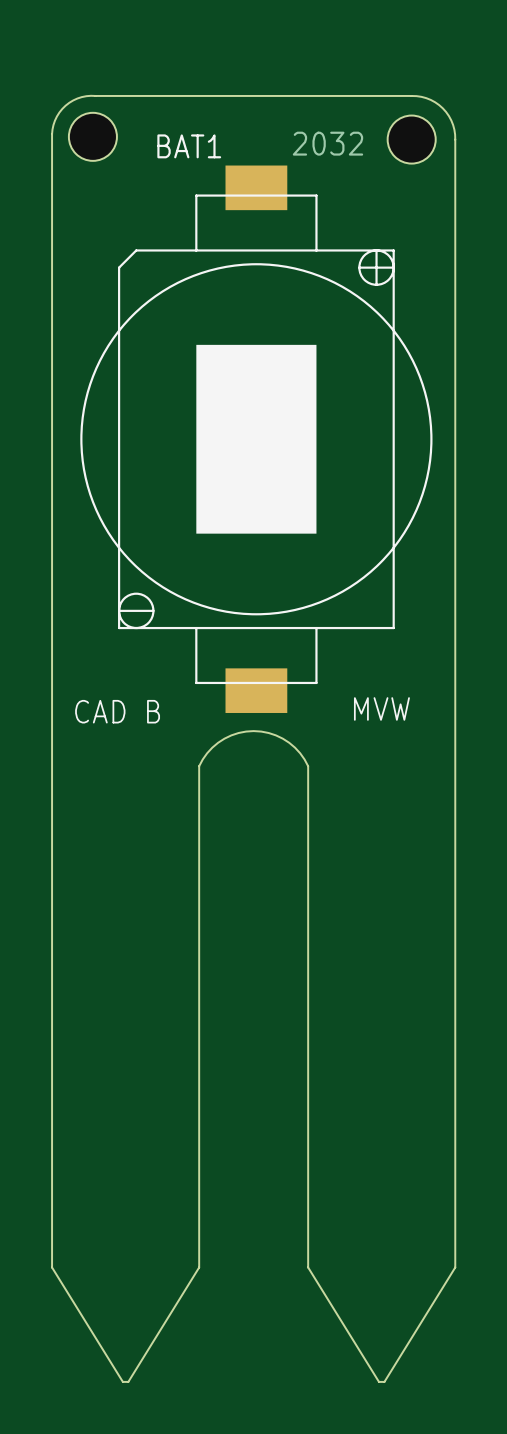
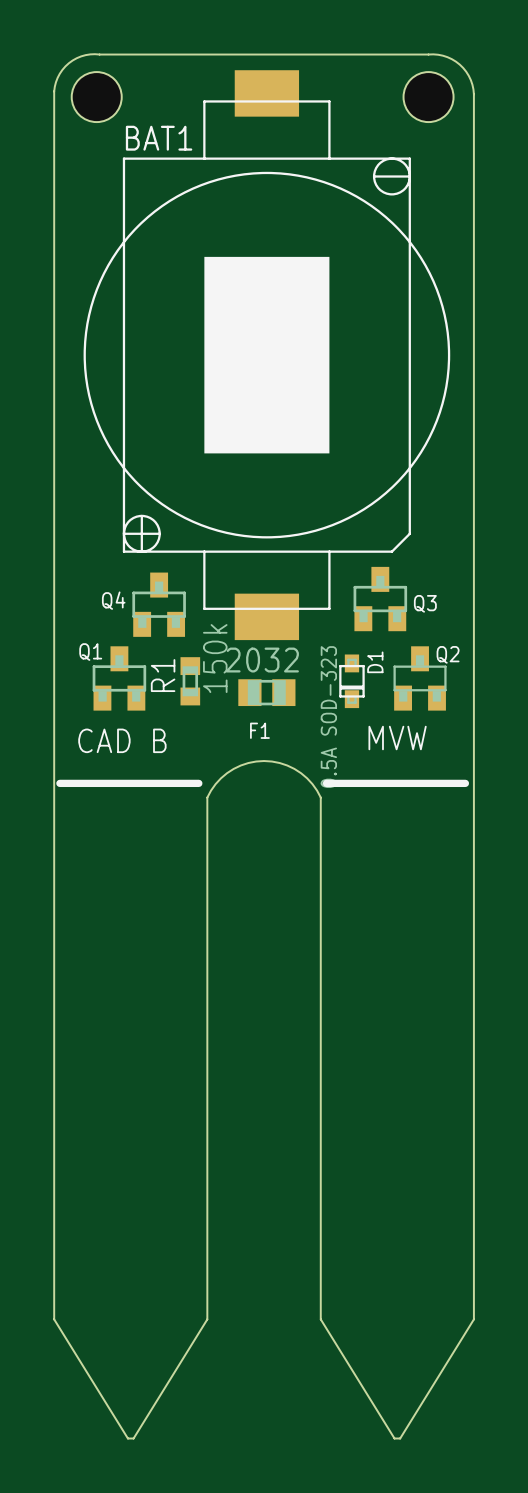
board edge: (52, 134) (54, 120) (62, 108) (73, 100) (86, 96) (411, 95) (426, 98) (442, 108) (453, 125) (455, 139) -> (54, 139) (55, 82) (59, 73) (68, 63) (85, 55) (433, 54) (442, 55) (455, 61) (463, 67) (470, 80) (473, 94) (473, 145)
hole position: (92, 136) -> (96, 97)
hole position: (411, 139) -> (428, 97)
BAT1 value position: 2032 (327, 143) -> 2032 (262, 660)
BAT1 name position: BAT1 (189, 146) -> BAT1 (159, 138)
BAT1 rotation: 0° (256, 439) -> 180° (266, 355)
Q3: none -> (380, 599)
Q4: none -> (159, 604)
Q1: none -> (119, 678)
Q2: none -> (420, 678)
R1: none -> 150k (190, 681)
D1: none -> 0.5A SOD-323 (351, 681)
F1: none -> (266, 692)
line: none -> (198, 783) (59, 783)
line: none -> (465, 783) (326, 783)

